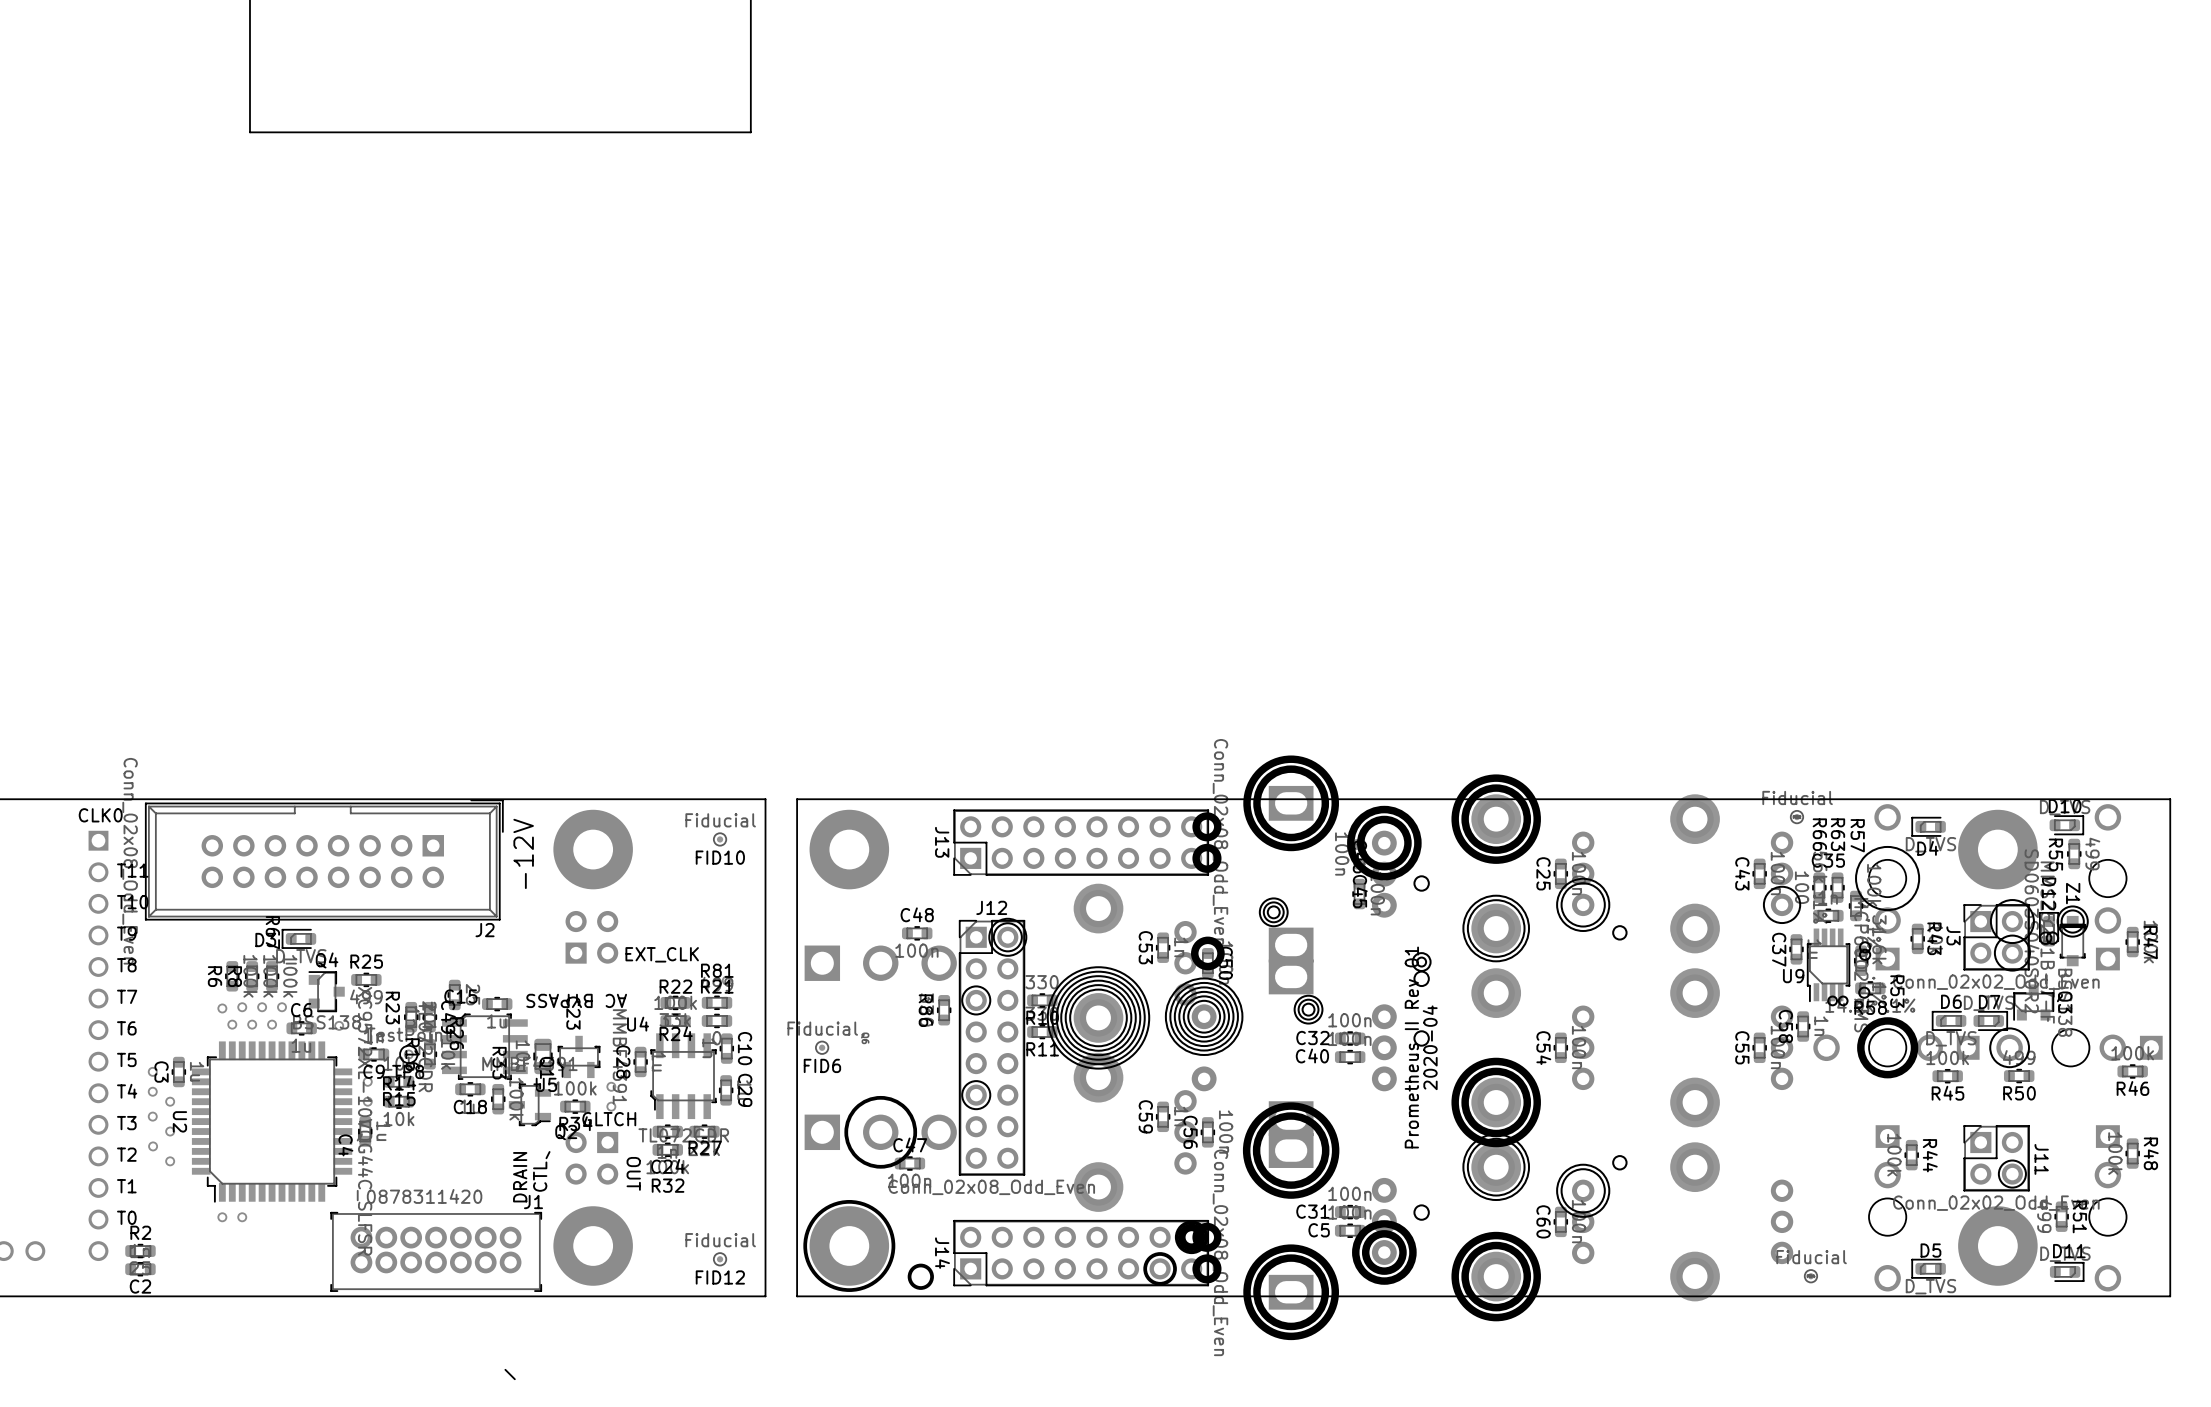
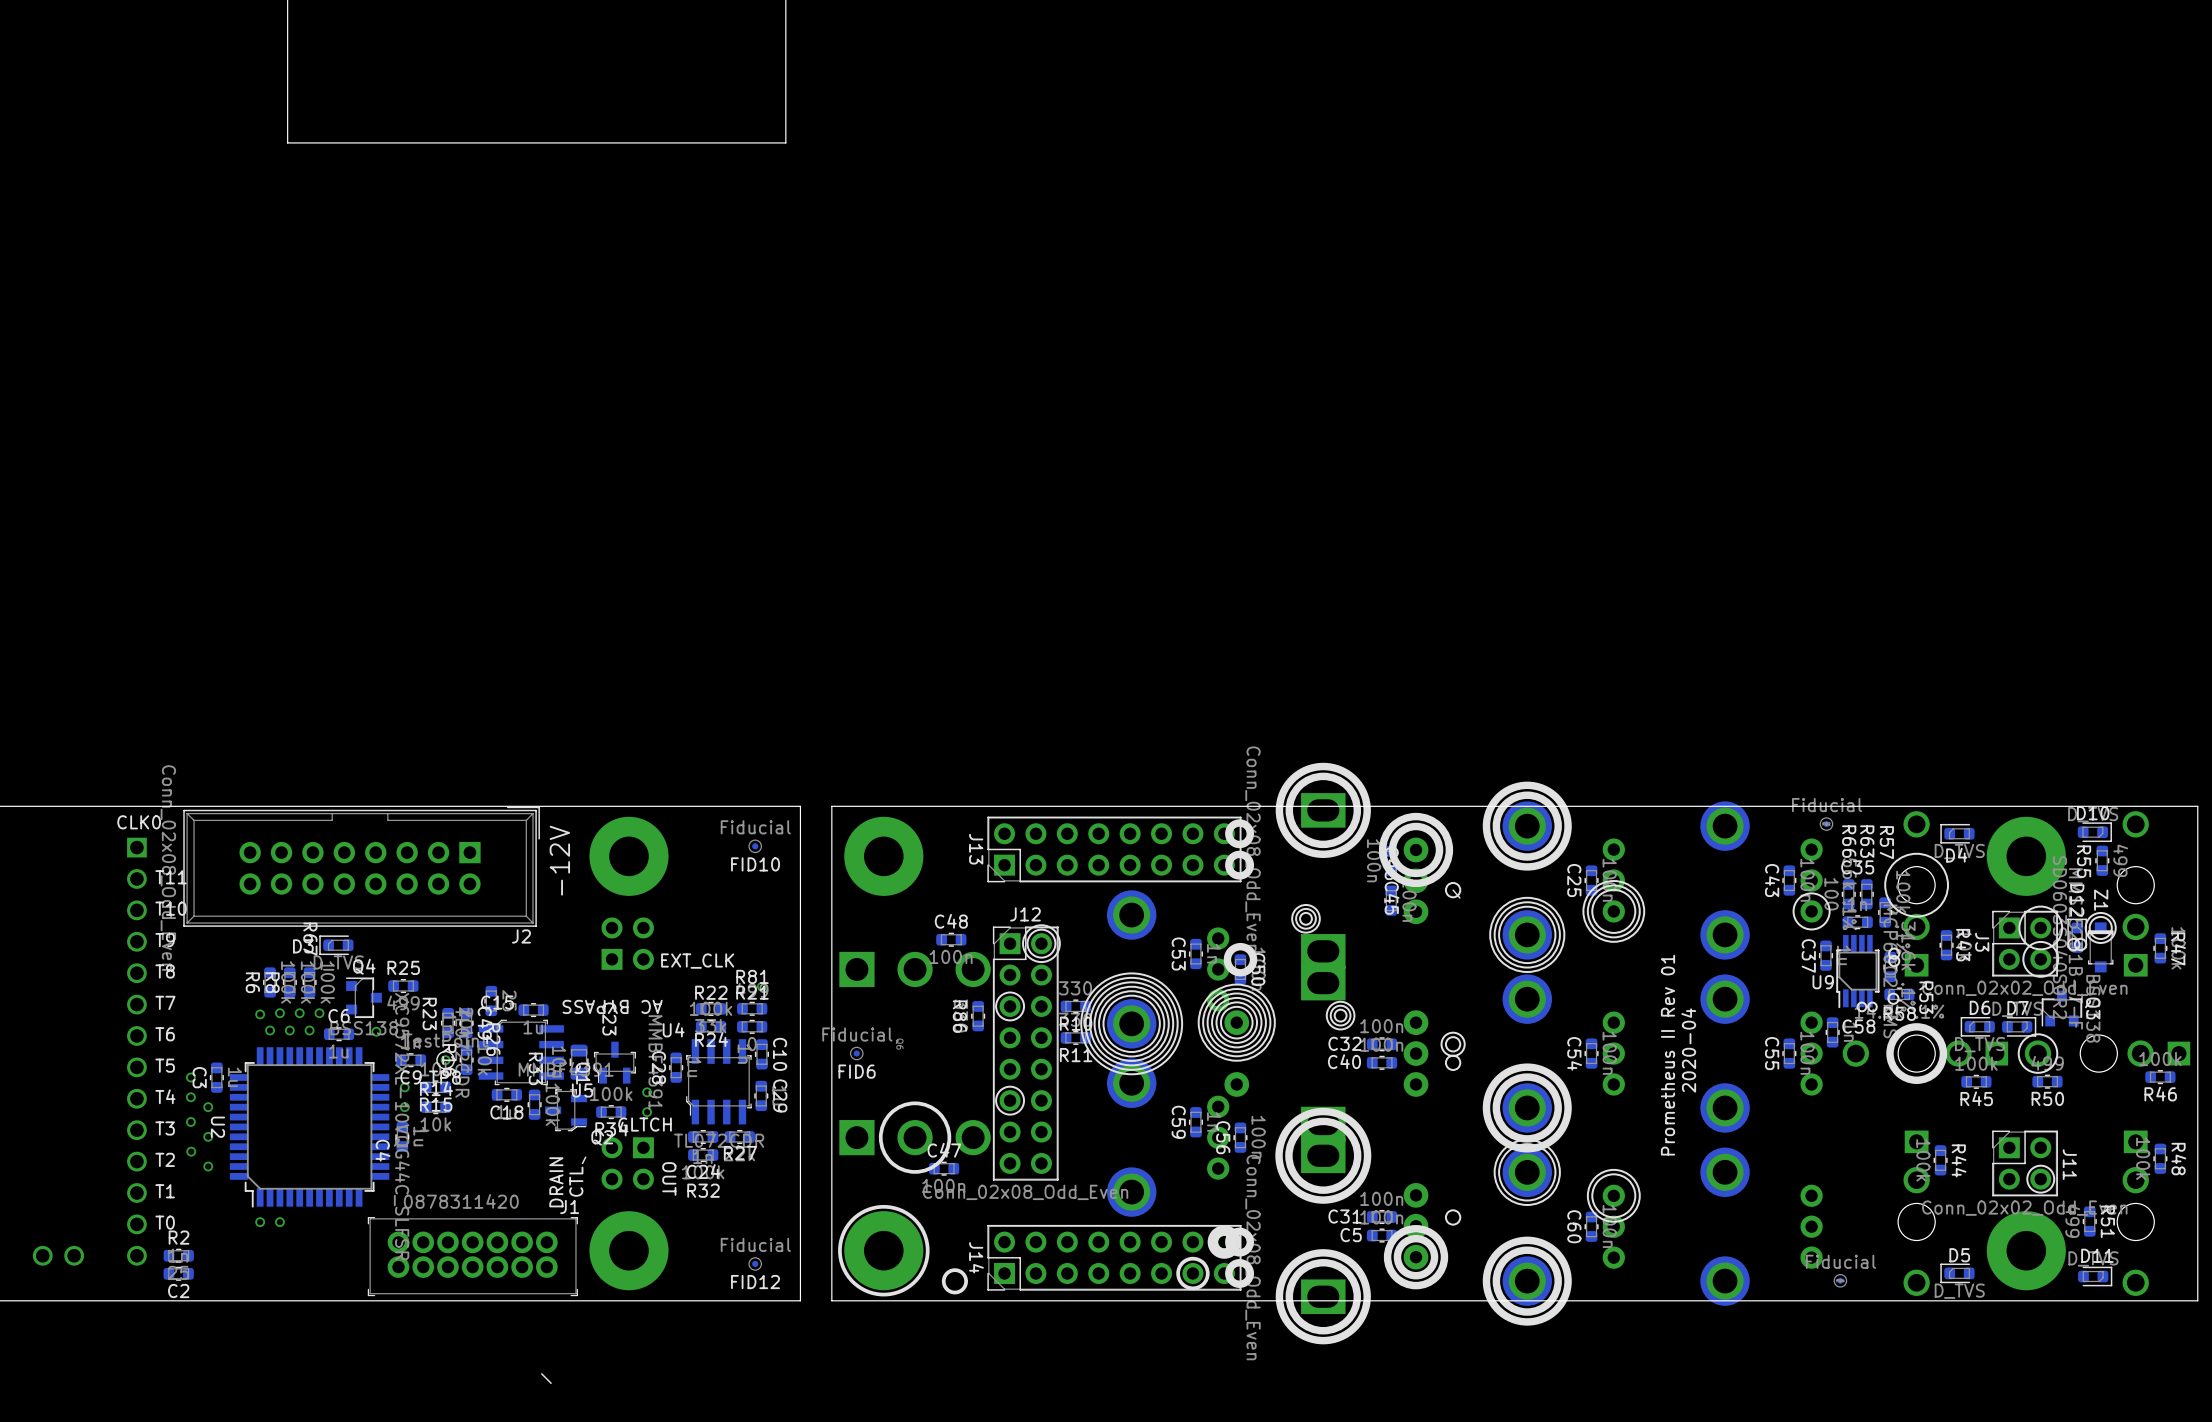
drawing: none -> [1582, 880, 1646, 943]
line: none -> (1453, 890) (1459, 898)
drawing: none -> [1489, 896, 1566, 973]
drawing: [1612, 925, 1628, 941] -> none
drawing: [1411, 952, 1432, 972] -> none
drawing position: (1421, 978) -> (1453, 1062)
drawing: none -> [1440, 1031, 1466, 1057]
C58 name rotation: 0° (1785, 1026) -> 90° counterclockwise (1858, 1026)
C58 name position: C58 (1785, 1026) -> C58 (1858, 1026)
text position: Prometheus II Rev 01 (1411, 1047) -> Prometheus II Rev 01 (1668, 1055)
text position: 2020-04 (1430, 1047) -> 2020-04 (1688, 1050)
drawing: [1612, 1155, 1628, 1171] -> none

